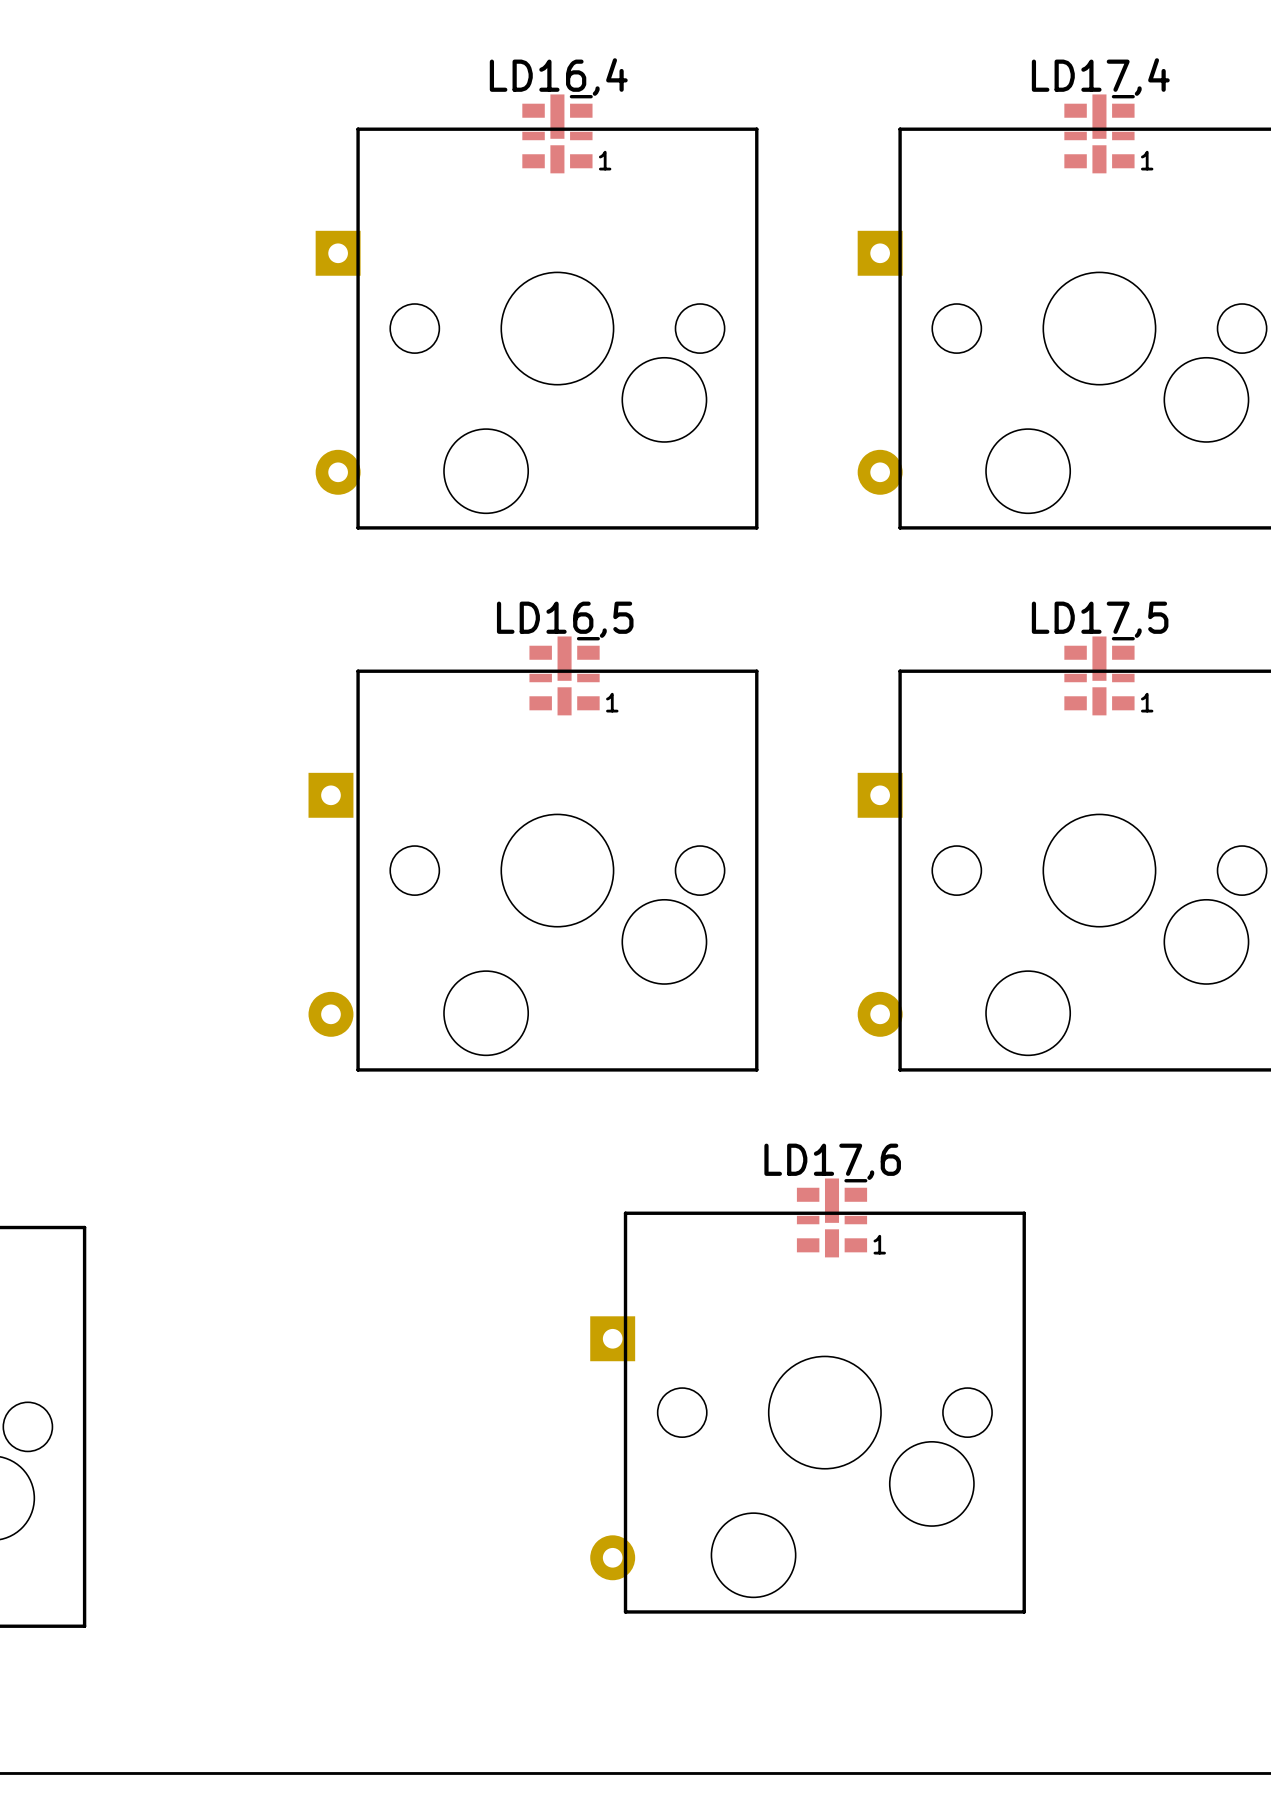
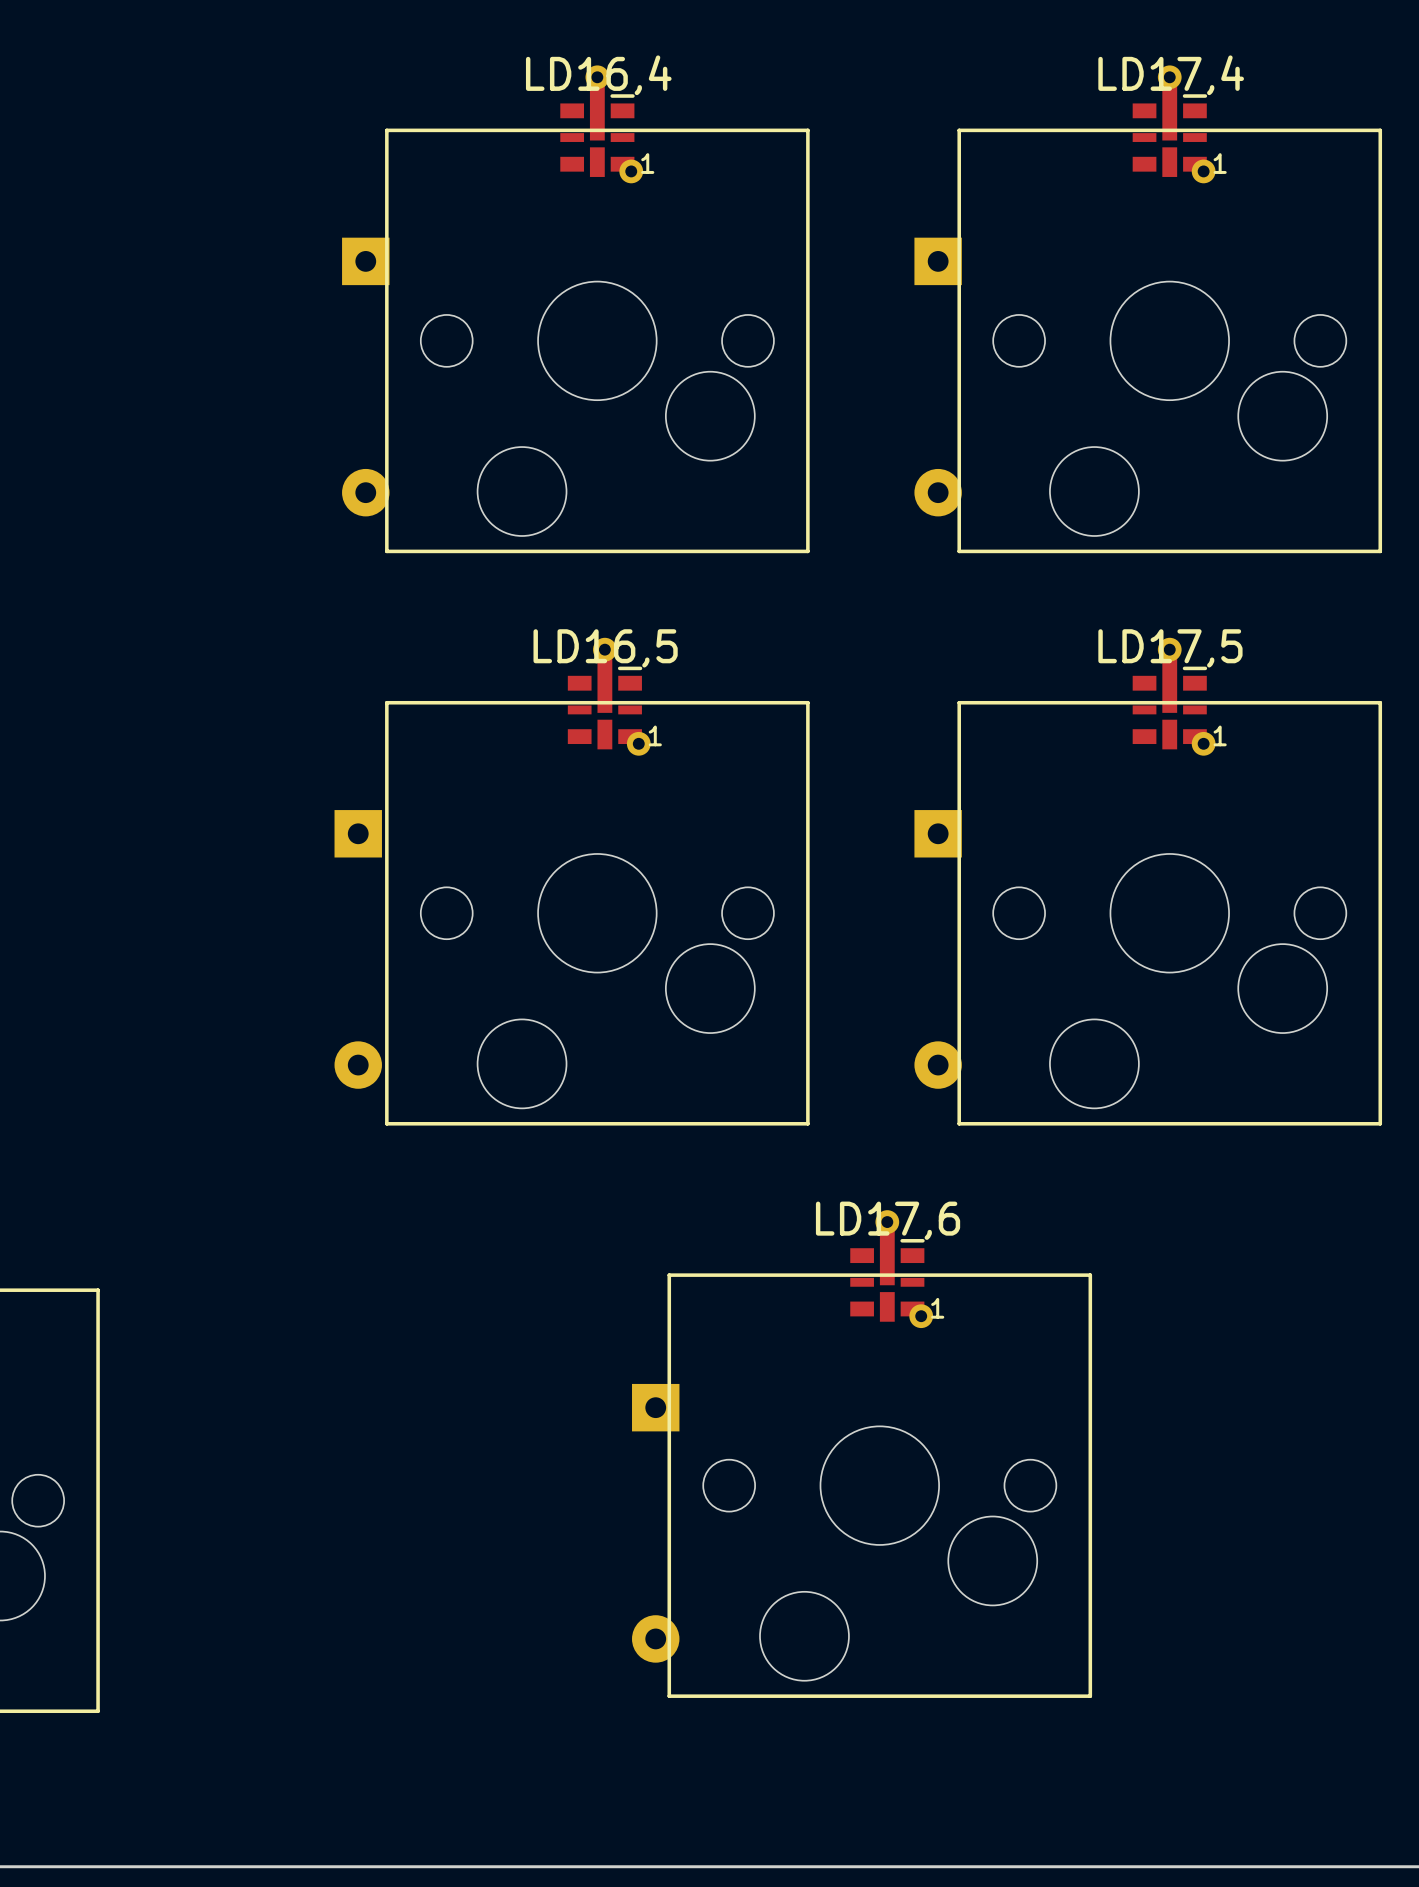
LD16,4 footprint: [522, 94, 593, 174] -> [560, 65, 644, 184]
LD17,4 footprint: [1064, 94, 1135, 174] -> [1132, 65, 1216, 184]
LD16,5 footprint: [529, 636, 600, 716] -> [567, 637, 651, 756]
LD17,5 footprint: [1064, 636, 1135, 716] -> [1132, 637, 1216, 756]
LD17,6 footprint: [796, 1178, 868, 1258] -> [850, 1210, 934, 1329]

